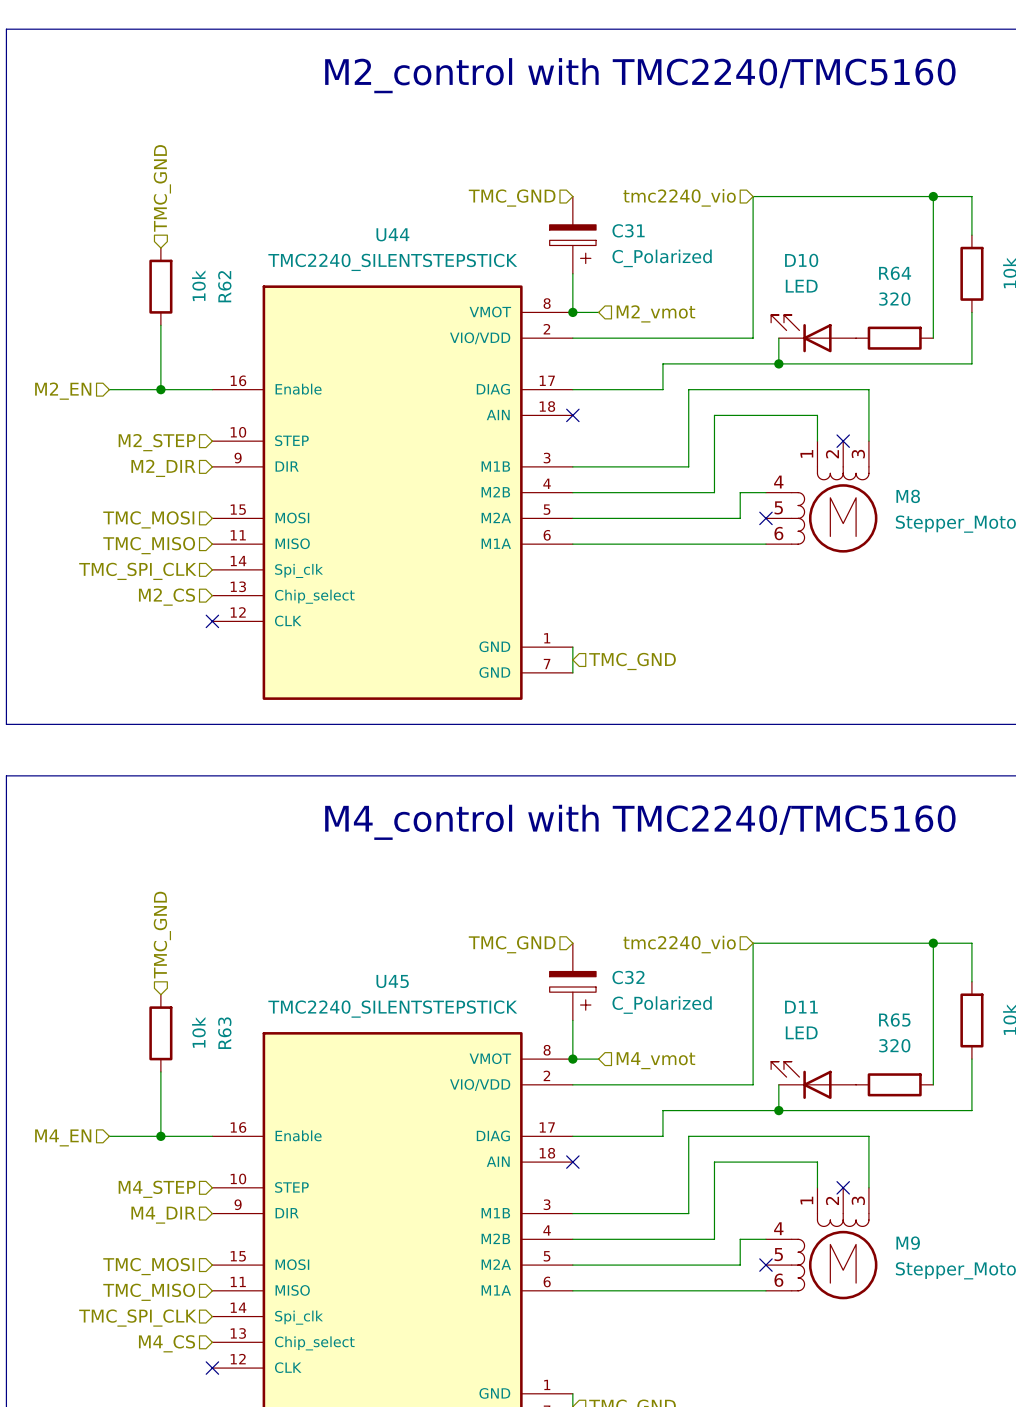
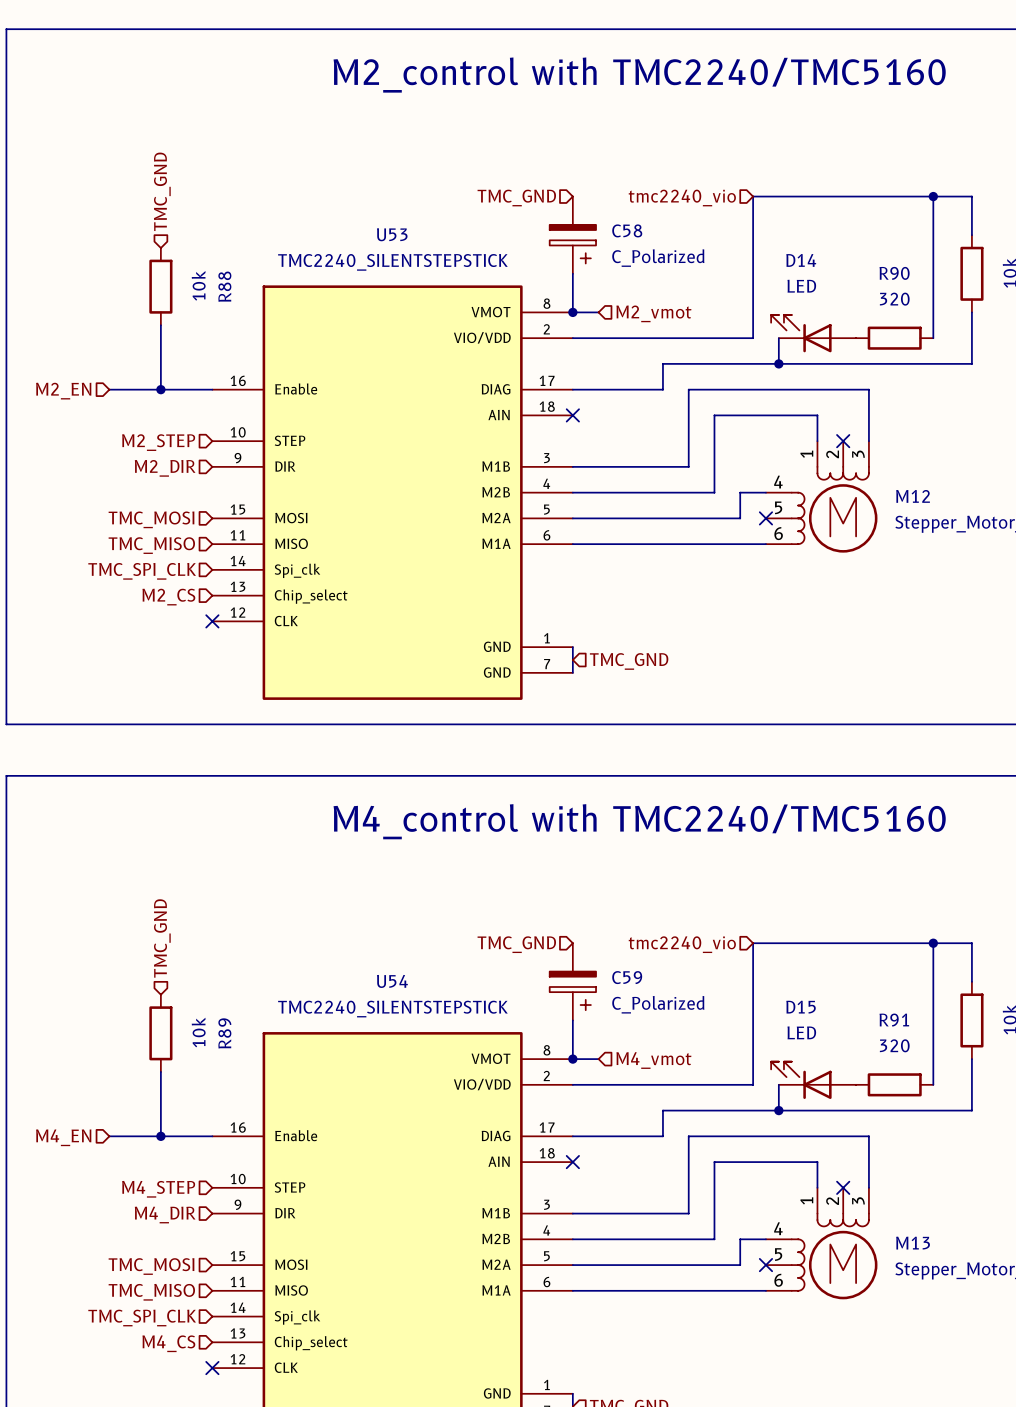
C31 name: C31 (628, 230) -> C58 (627, 230)
U44 name: U44 (392, 234) -> U53 (392, 234)
D10 name: D10 (801, 260) -> D14 (801, 260)
R64 name: R64 (895, 273) -> R90 (894, 273)
R62 name: R62 (224, 286) -> R88 (224, 286)
M8 name: M8 (908, 496) -> M12 (913, 496)
C32 name: C32 (628, 977) -> C59 (627, 977)
U45 name: U45 (392, 981) -> U54 (392, 981)
D11 name: D11 (801, 1007) -> D15 (801, 1007)
R65 name: R65 (894, 1020) -> R91 (894, 1020)
R63 name: R63 (224, 1033) -> R89 (224, 1033)
M9 name: M9 (908, 1243) -> M13 (913, 1243)

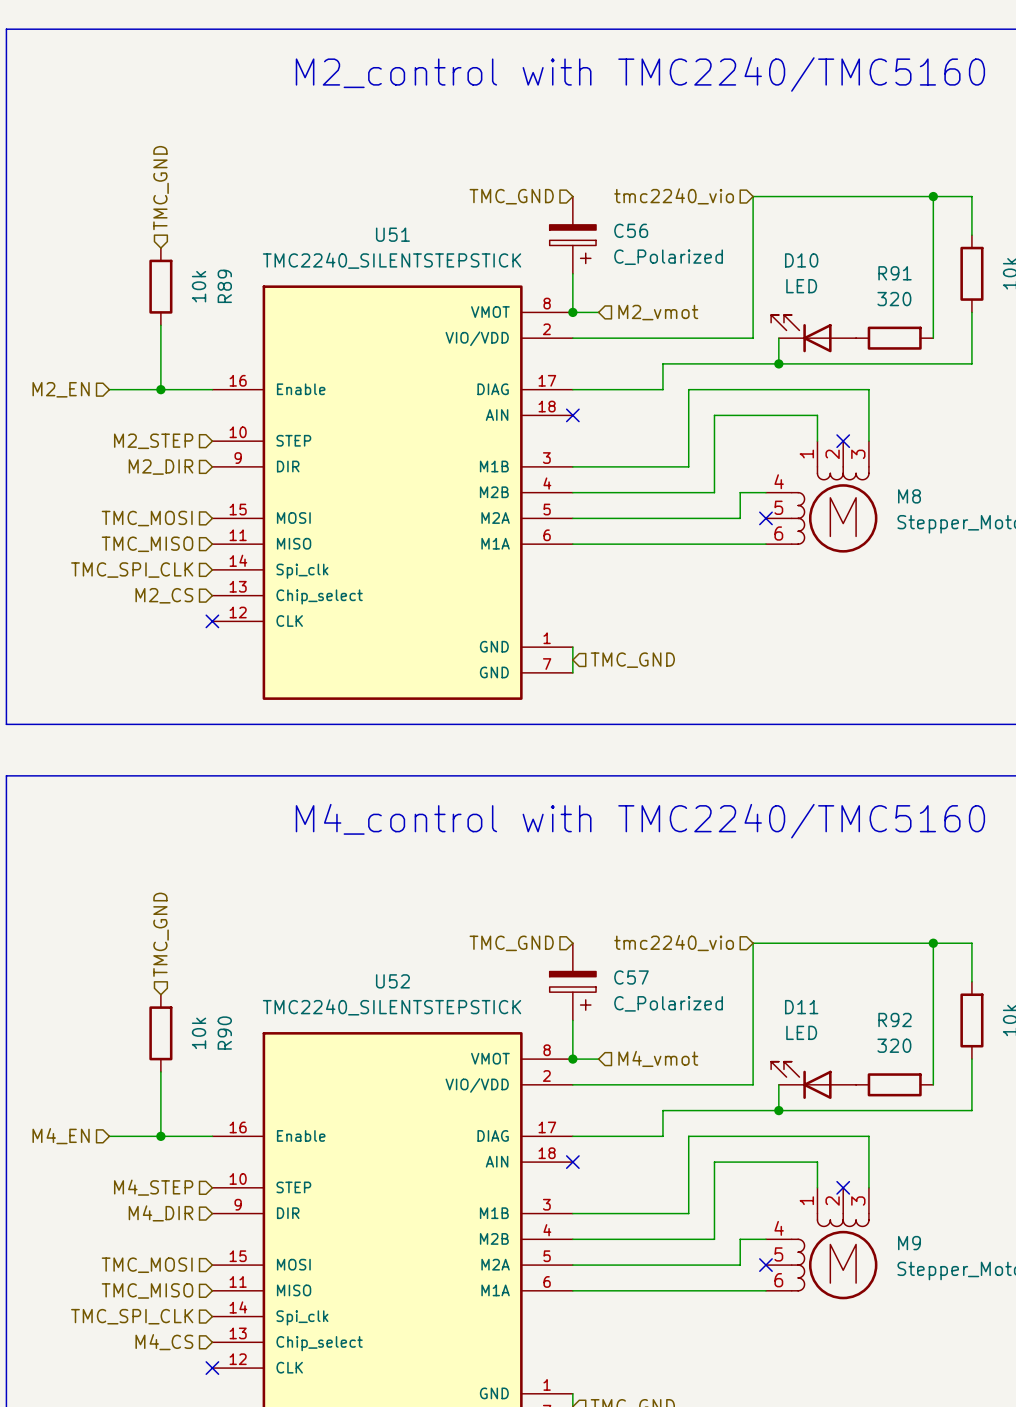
C58 name: C58 (627, 230) -> C56 (631, 230)
U53 name: U53 (392, 234) -> U51 (392, 234)
D14 name: D14 (801, 260) -> D10 (801, 260)
R90 name: R90 (894, 273) -> R91 (895, 273)
R88 name: R88 (224, 286) -> R89 (224, 286)
M12 name: M12 (913, 496) -> M8 (909, 496)
C59 name: C59 (627, 977) -> C57 (631, 977)
U54 name: U54 (392, 981) -> U52 (392, 981)
D15 name: D15 (801, 1007) -> D11 (801, 1007)
R91 name: R91 (894, 1020) -> R92 (895, 1019)
R89 name: R89 (224, 1033) -> R90 (224, 1033)
M13 name: M13 (913, 1243) -> M9 (909, 1243)

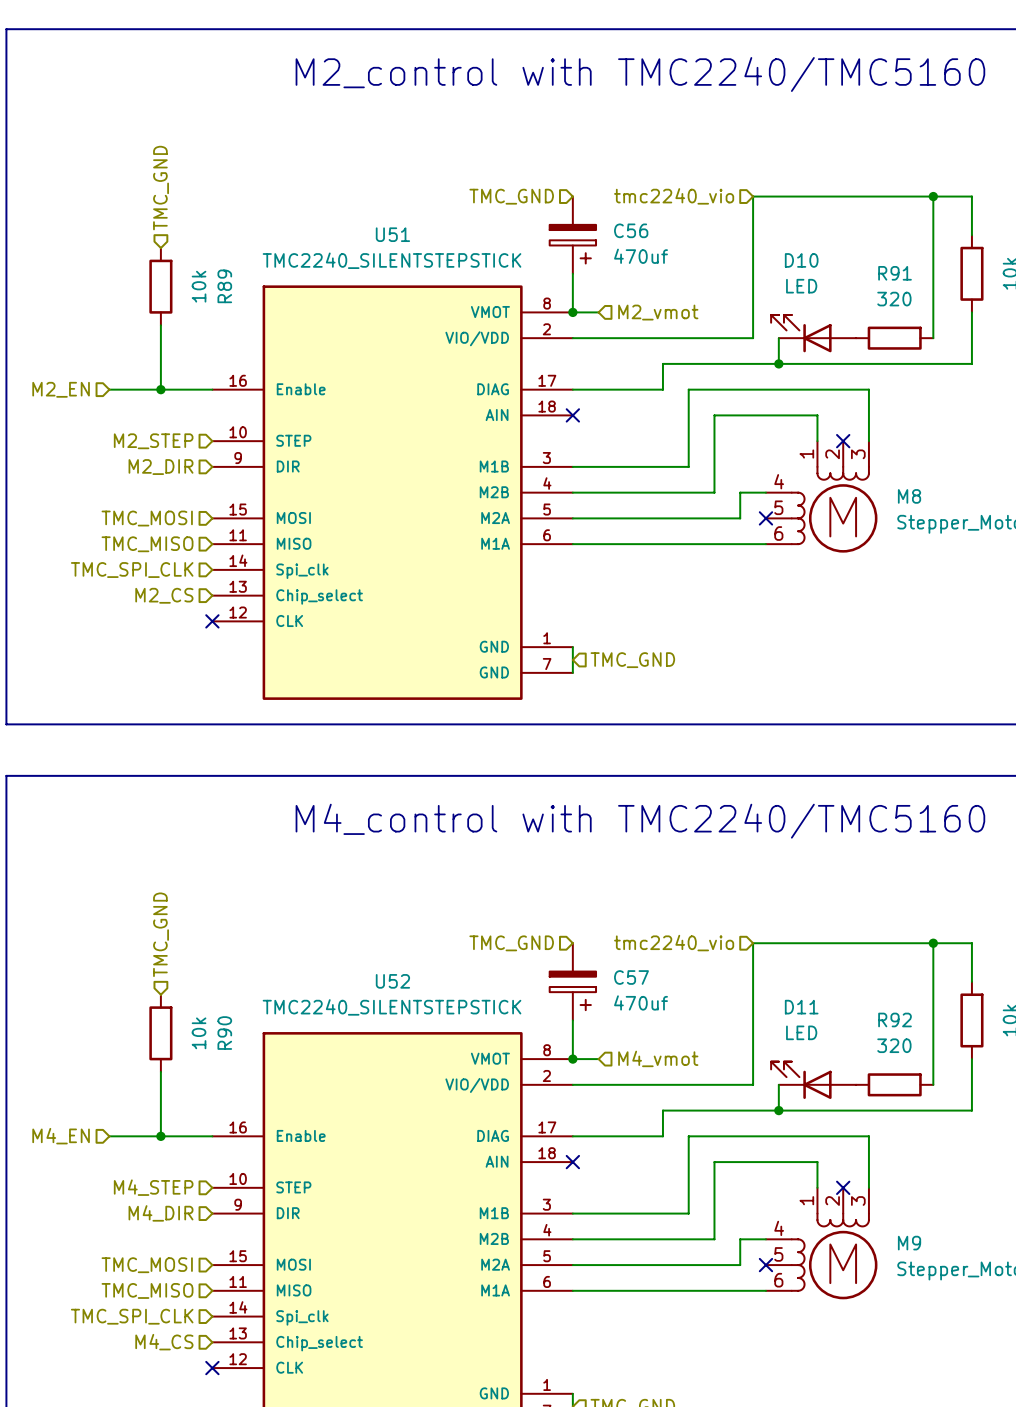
C56 value: C_Polarized (668, 257) -> 470uf (641, 256)
C57 value: C_Polarized (668, 1003) -> 470uf (641, 1002)

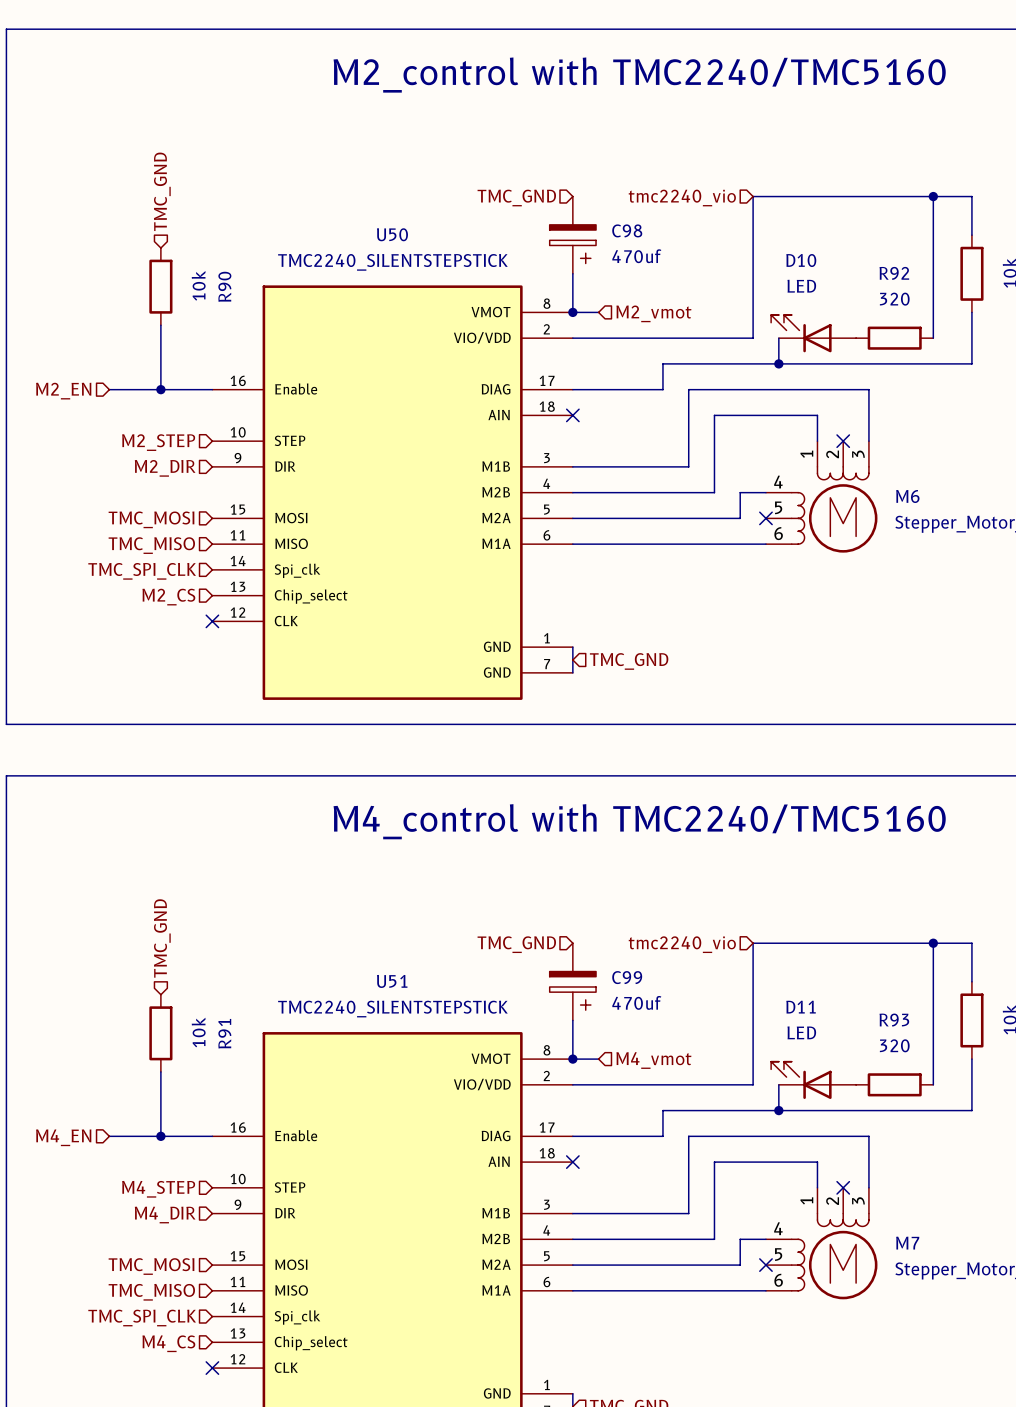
C56 name: C56 (631, 230) -> C98 (627, 230)
U51 name: U51 (392, 234) -> U50 (392, 234)
R91 name: R91 (895, 273) -> R92 (894, 273)
R89 name: R89 (224, 286) -> R90 (224, 286)
M8 name: M8 (909, 496) -> M6 (907, 496)
C57 name: C57 (631, 977) -> C99 (627, 977)
U52 name: U52 (392, 981) -> U51 (392, 981)
R92 name: R92 (895, 1019) -> R93 (894, 1020)
R90 name: R90 (224, 1033) -> R91 (224, 1033)
M9 name: M9 (909, 1243) -> M7 (907, 1243)

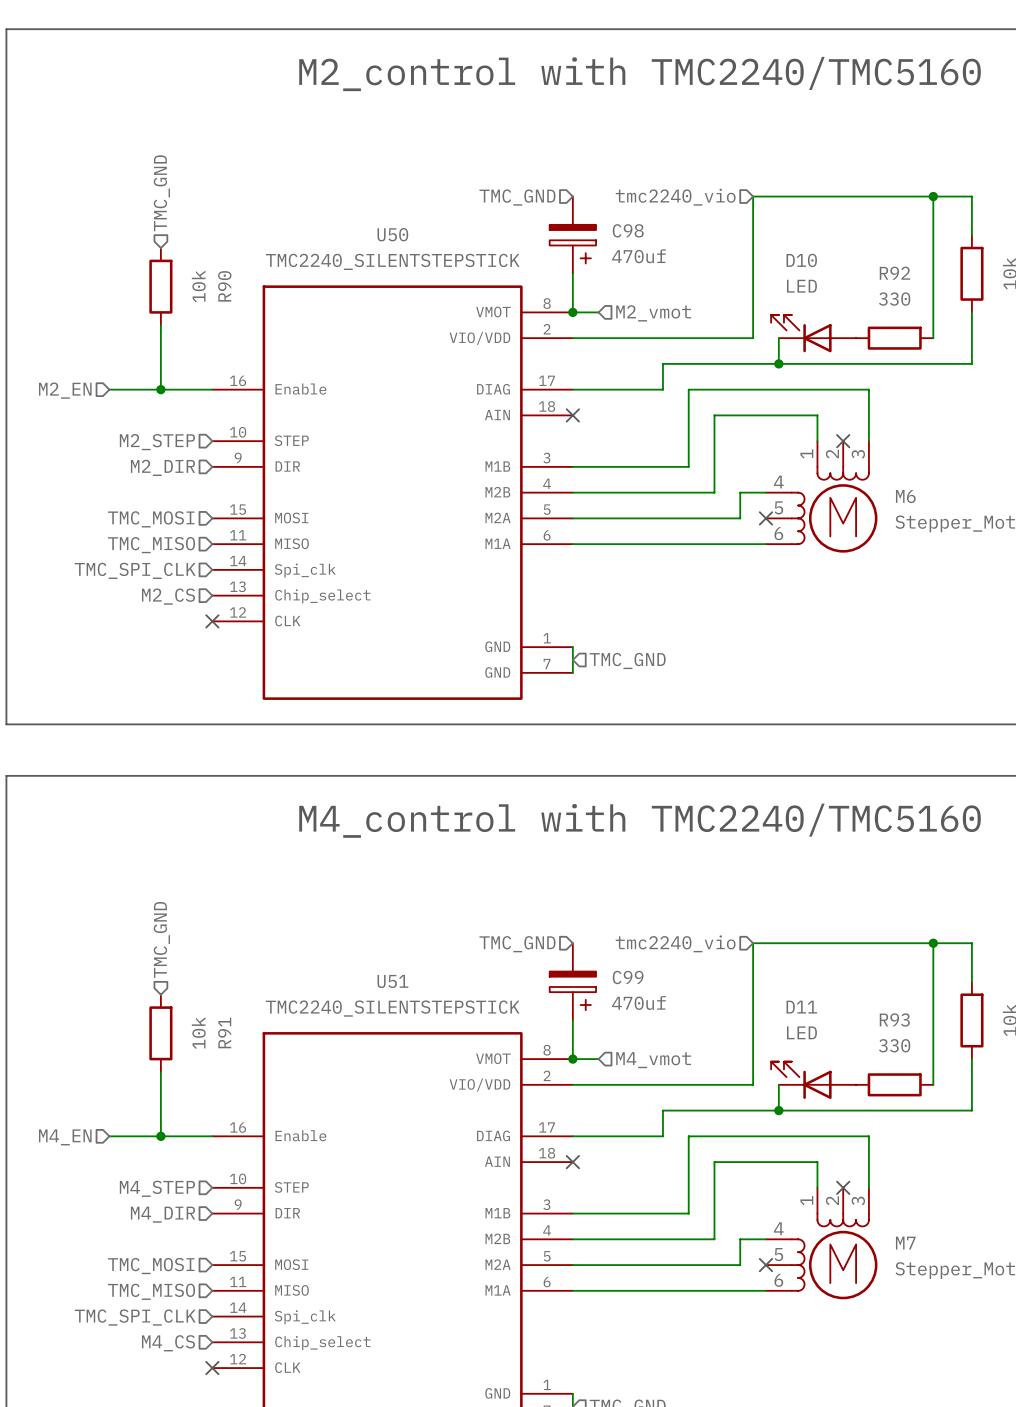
R92 value: 320 (894, 299) -> 330 (894, 299)
R93 value: 320 (894, 1045) -> 330 (894, 1045)

